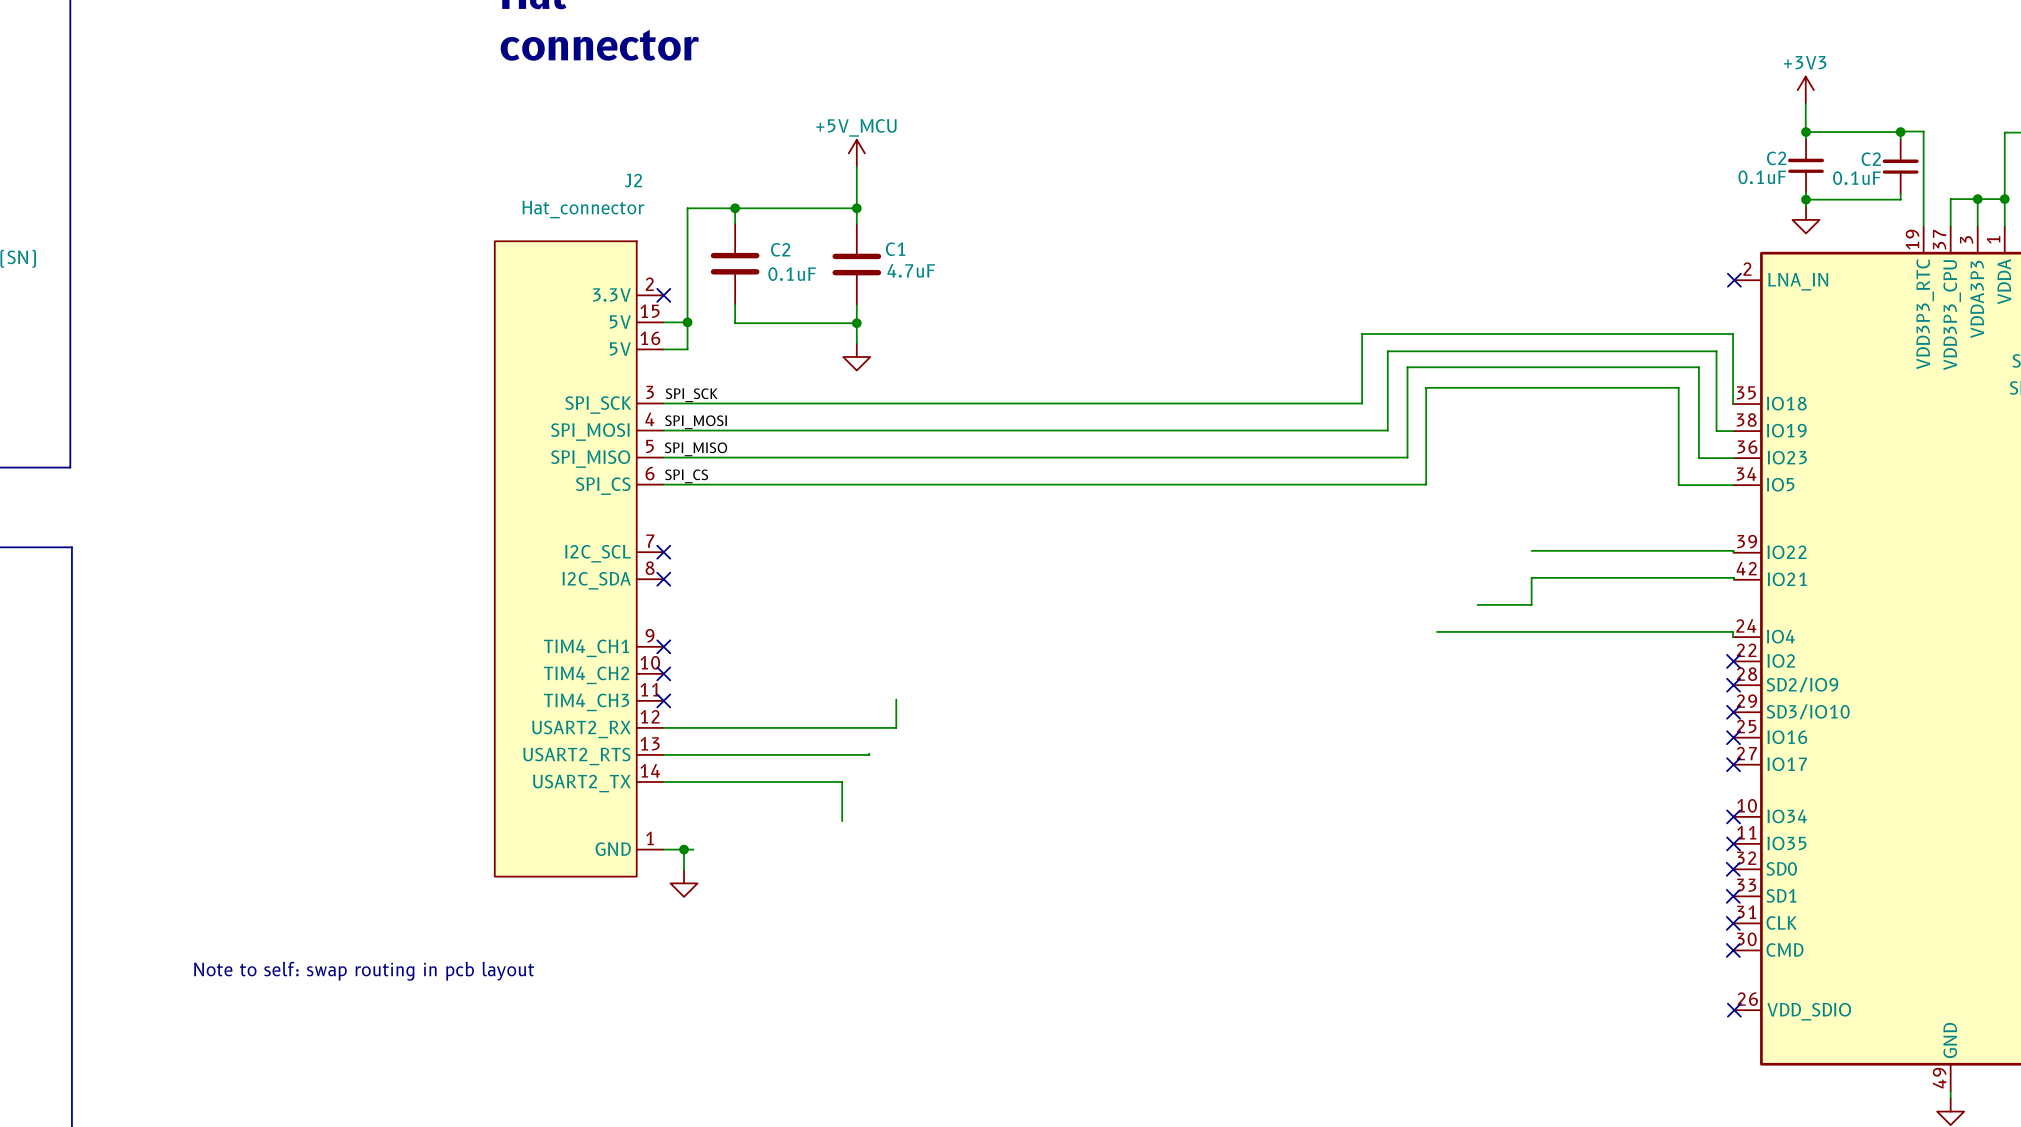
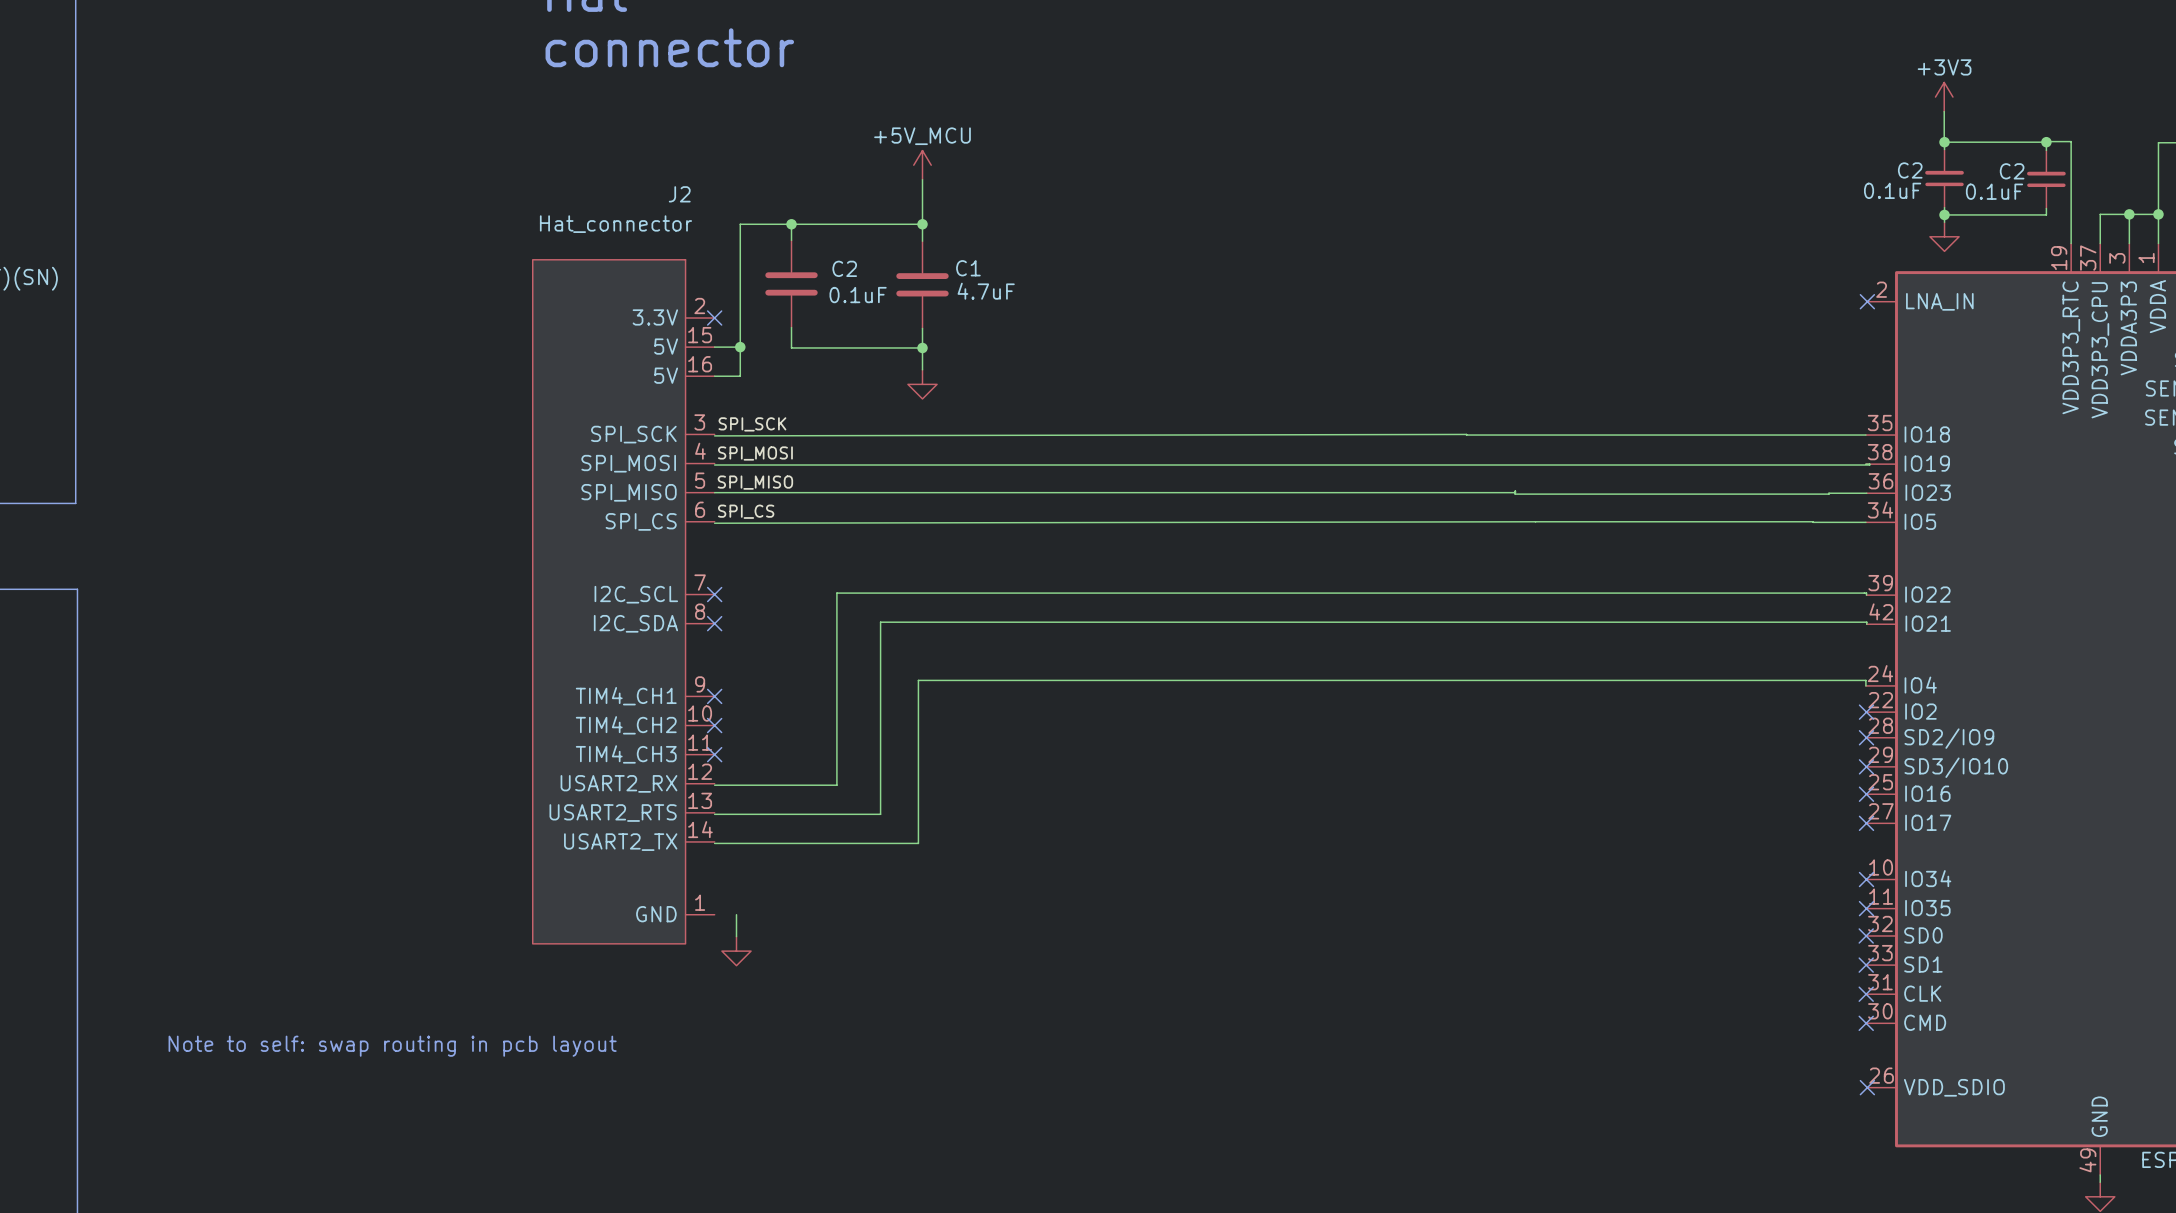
wire: (663, 403) (1362, 403) (1362, 334) (1733, 334) (1733, 404) -> (714, 435) (1865, 435)
wire: (663, 430) (1387, 430) (1387, 351) (1716, 351) (1716, 431) (1733, 431) -> (714, 465) (1869, 465) (1865, 464)
wire: (1407, 456) (1407, 367) (1698, 367) (1698, 458) -> (1515, 491) (1515, 494) (1829, 493)
wire: (663, 484) (1426, 484) (1426, 387) (1678, 387) (1678, 485) (1684, 485) -> (714, 523) (1813, 522)
wire: none -> (1649, 593) (836, 593) (836, 785) (714, 785)
wire: (1531, 577) (1531, 604) (1477, 604) -> (1649, 622) (880, 622) (880, 814) (714, 814)
wire: none -> (1547, 680) (918, 680) (918, 843) (714, 843)
wire: (896, 699) (896, 727) (663, 727) -> none
wire: (869, 753) (663, 754) -> none
wire: (663, 782) (842, 782) (842, 821) -> none
wire: (663, 849) (693, 849) -> none
junction: (684, 849) -> none

